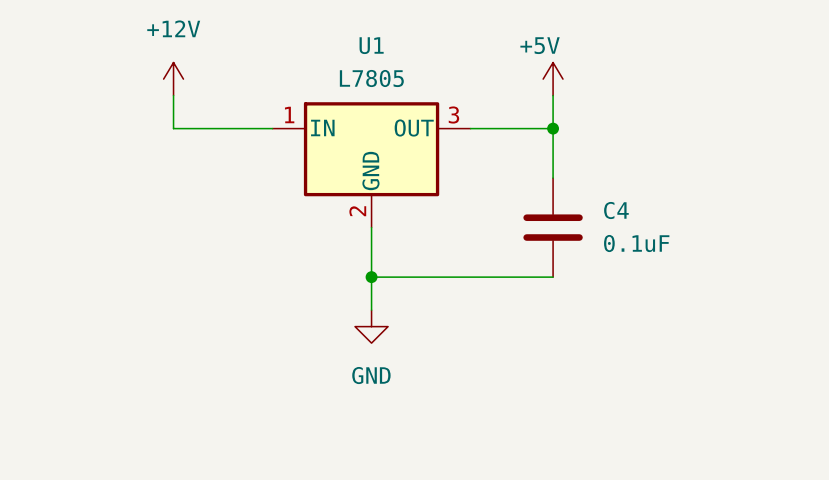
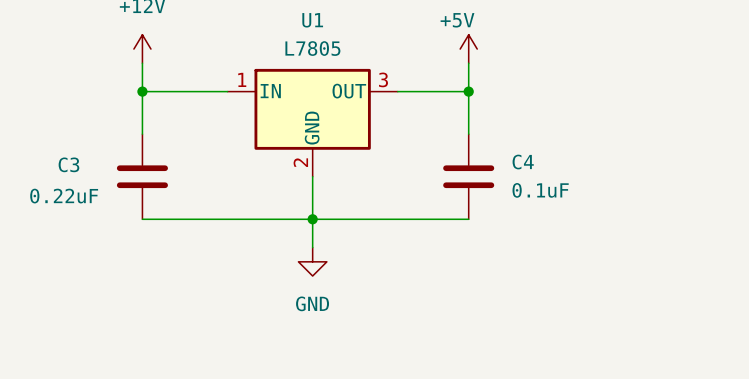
wire: none -> (142, 91) (142, 134)
junction: none -> (142, 91)
C3: none -> 0.22uF (142, 176)
wire: none -> (142, 219) (312, 219)

